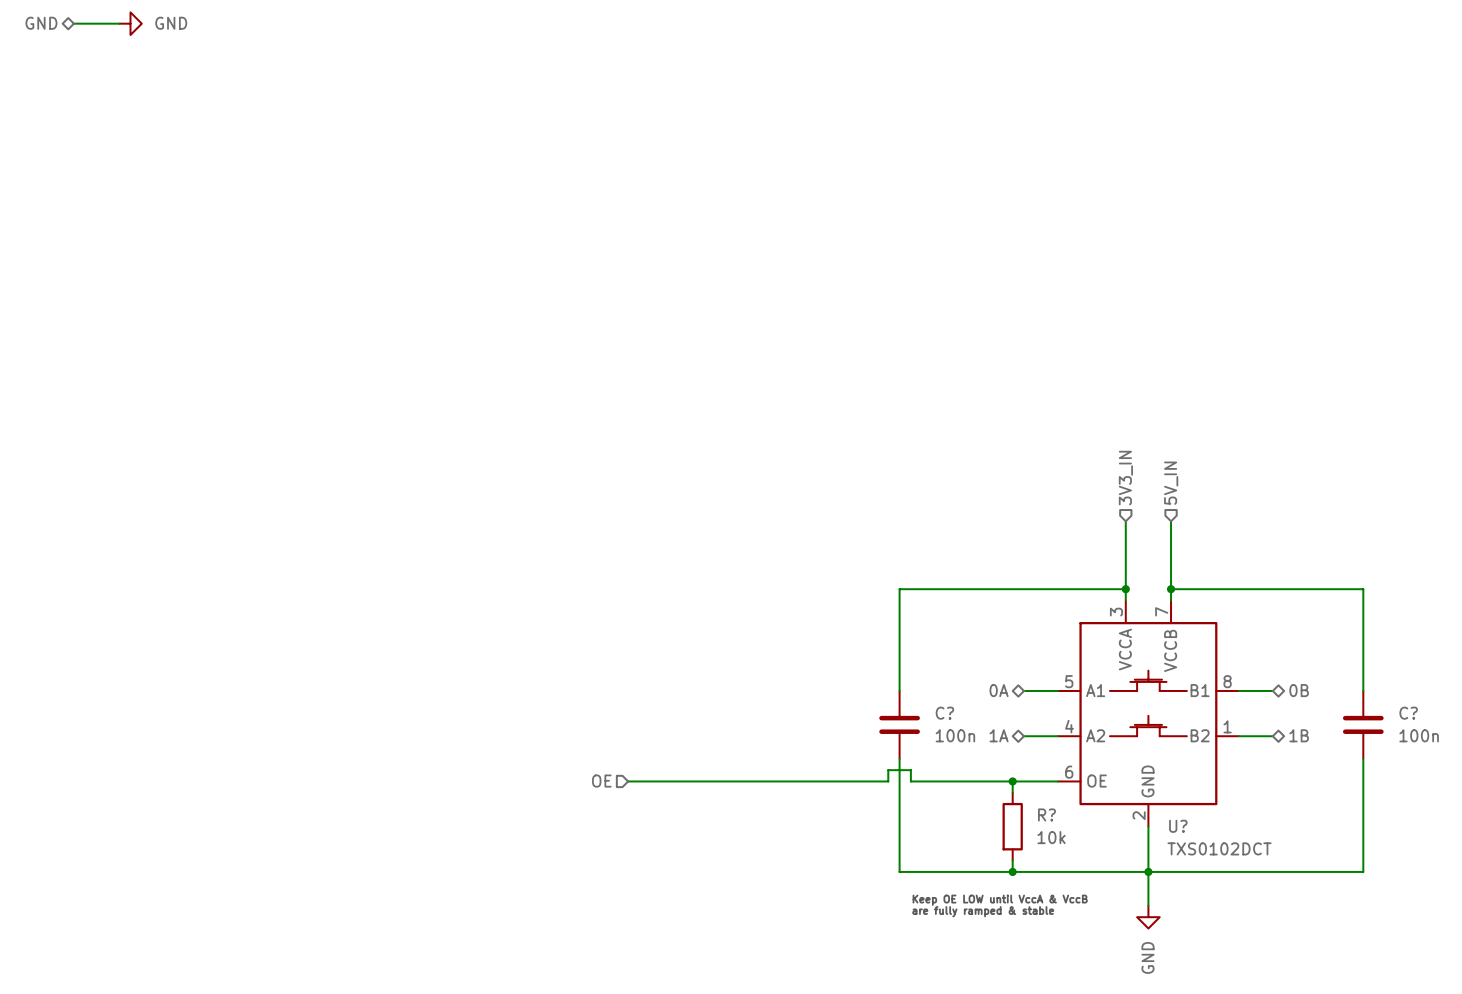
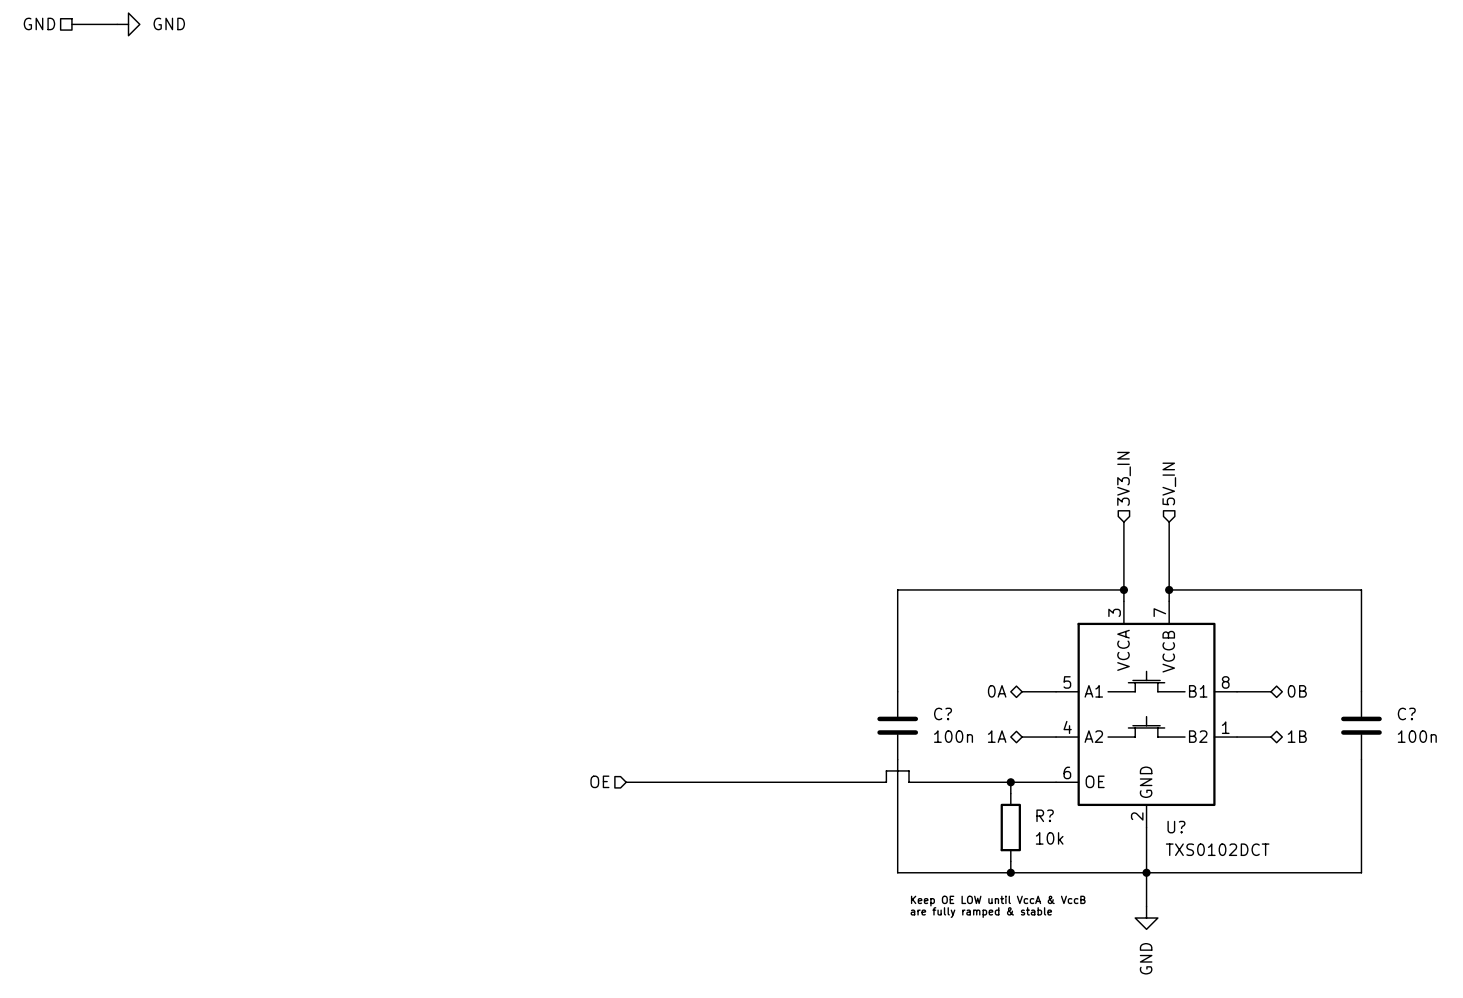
hierarchical label shape: bidirectional (41, 23) -> passive (39, 23)

